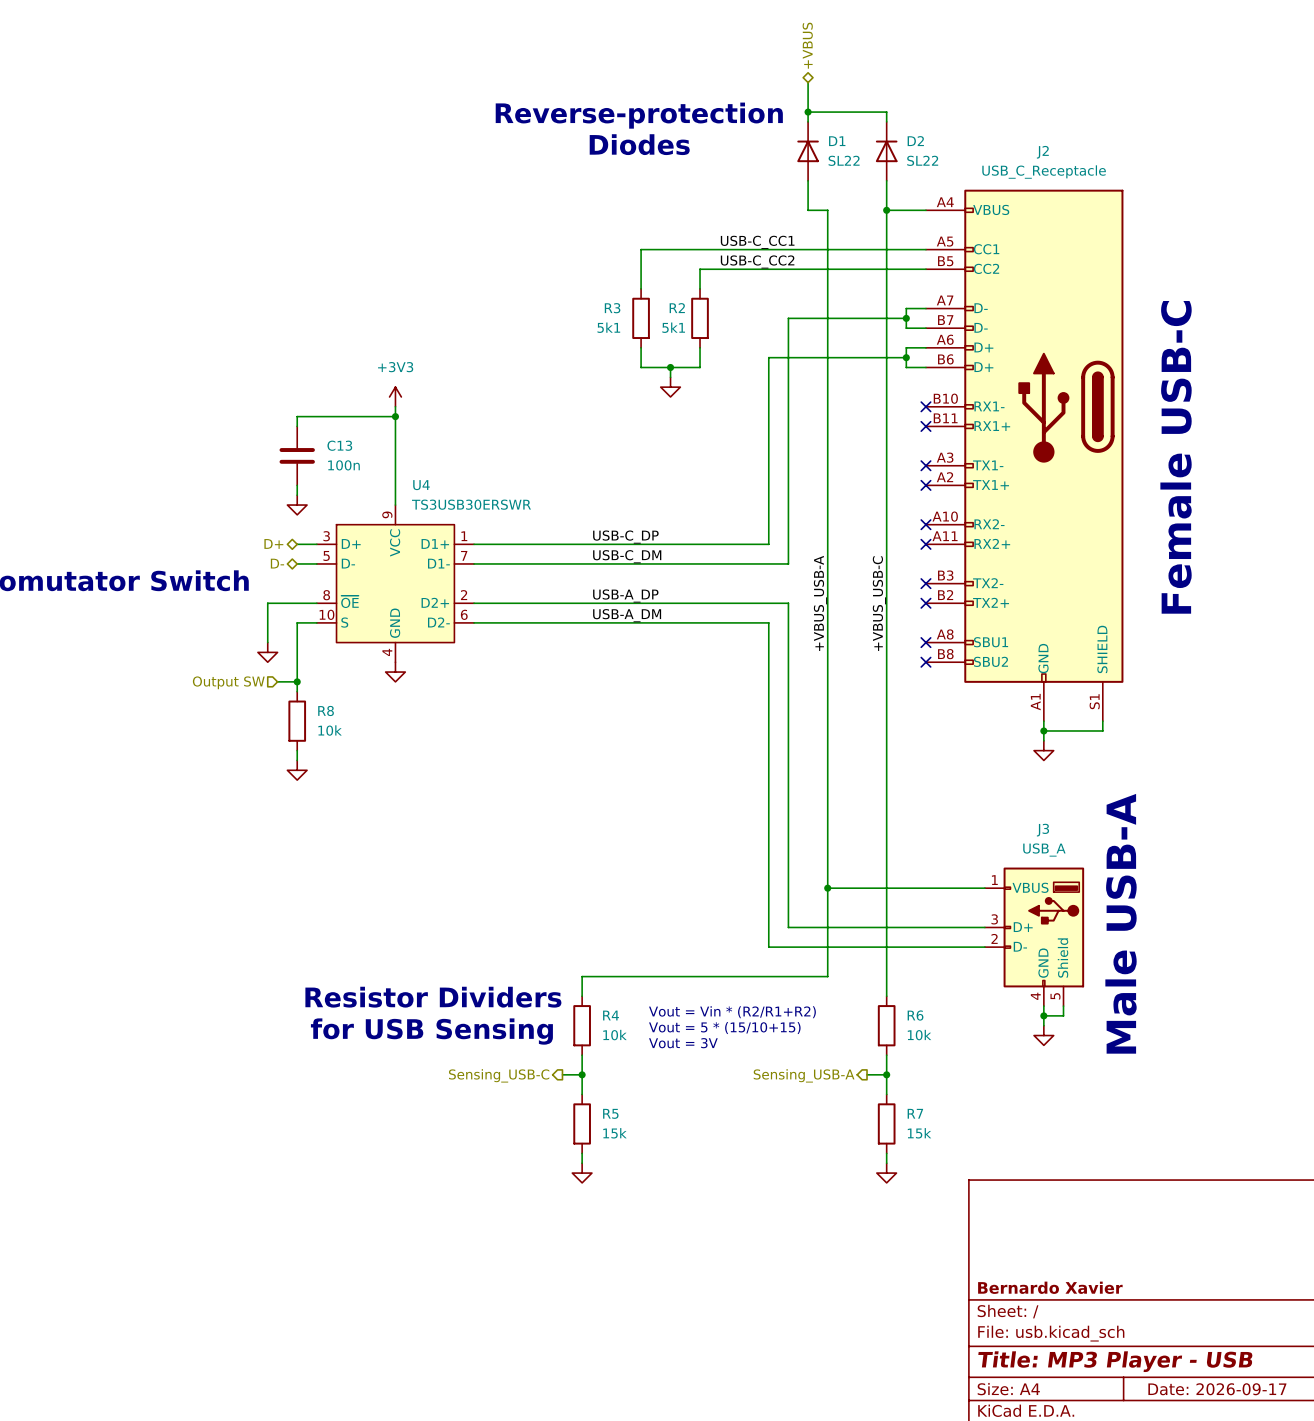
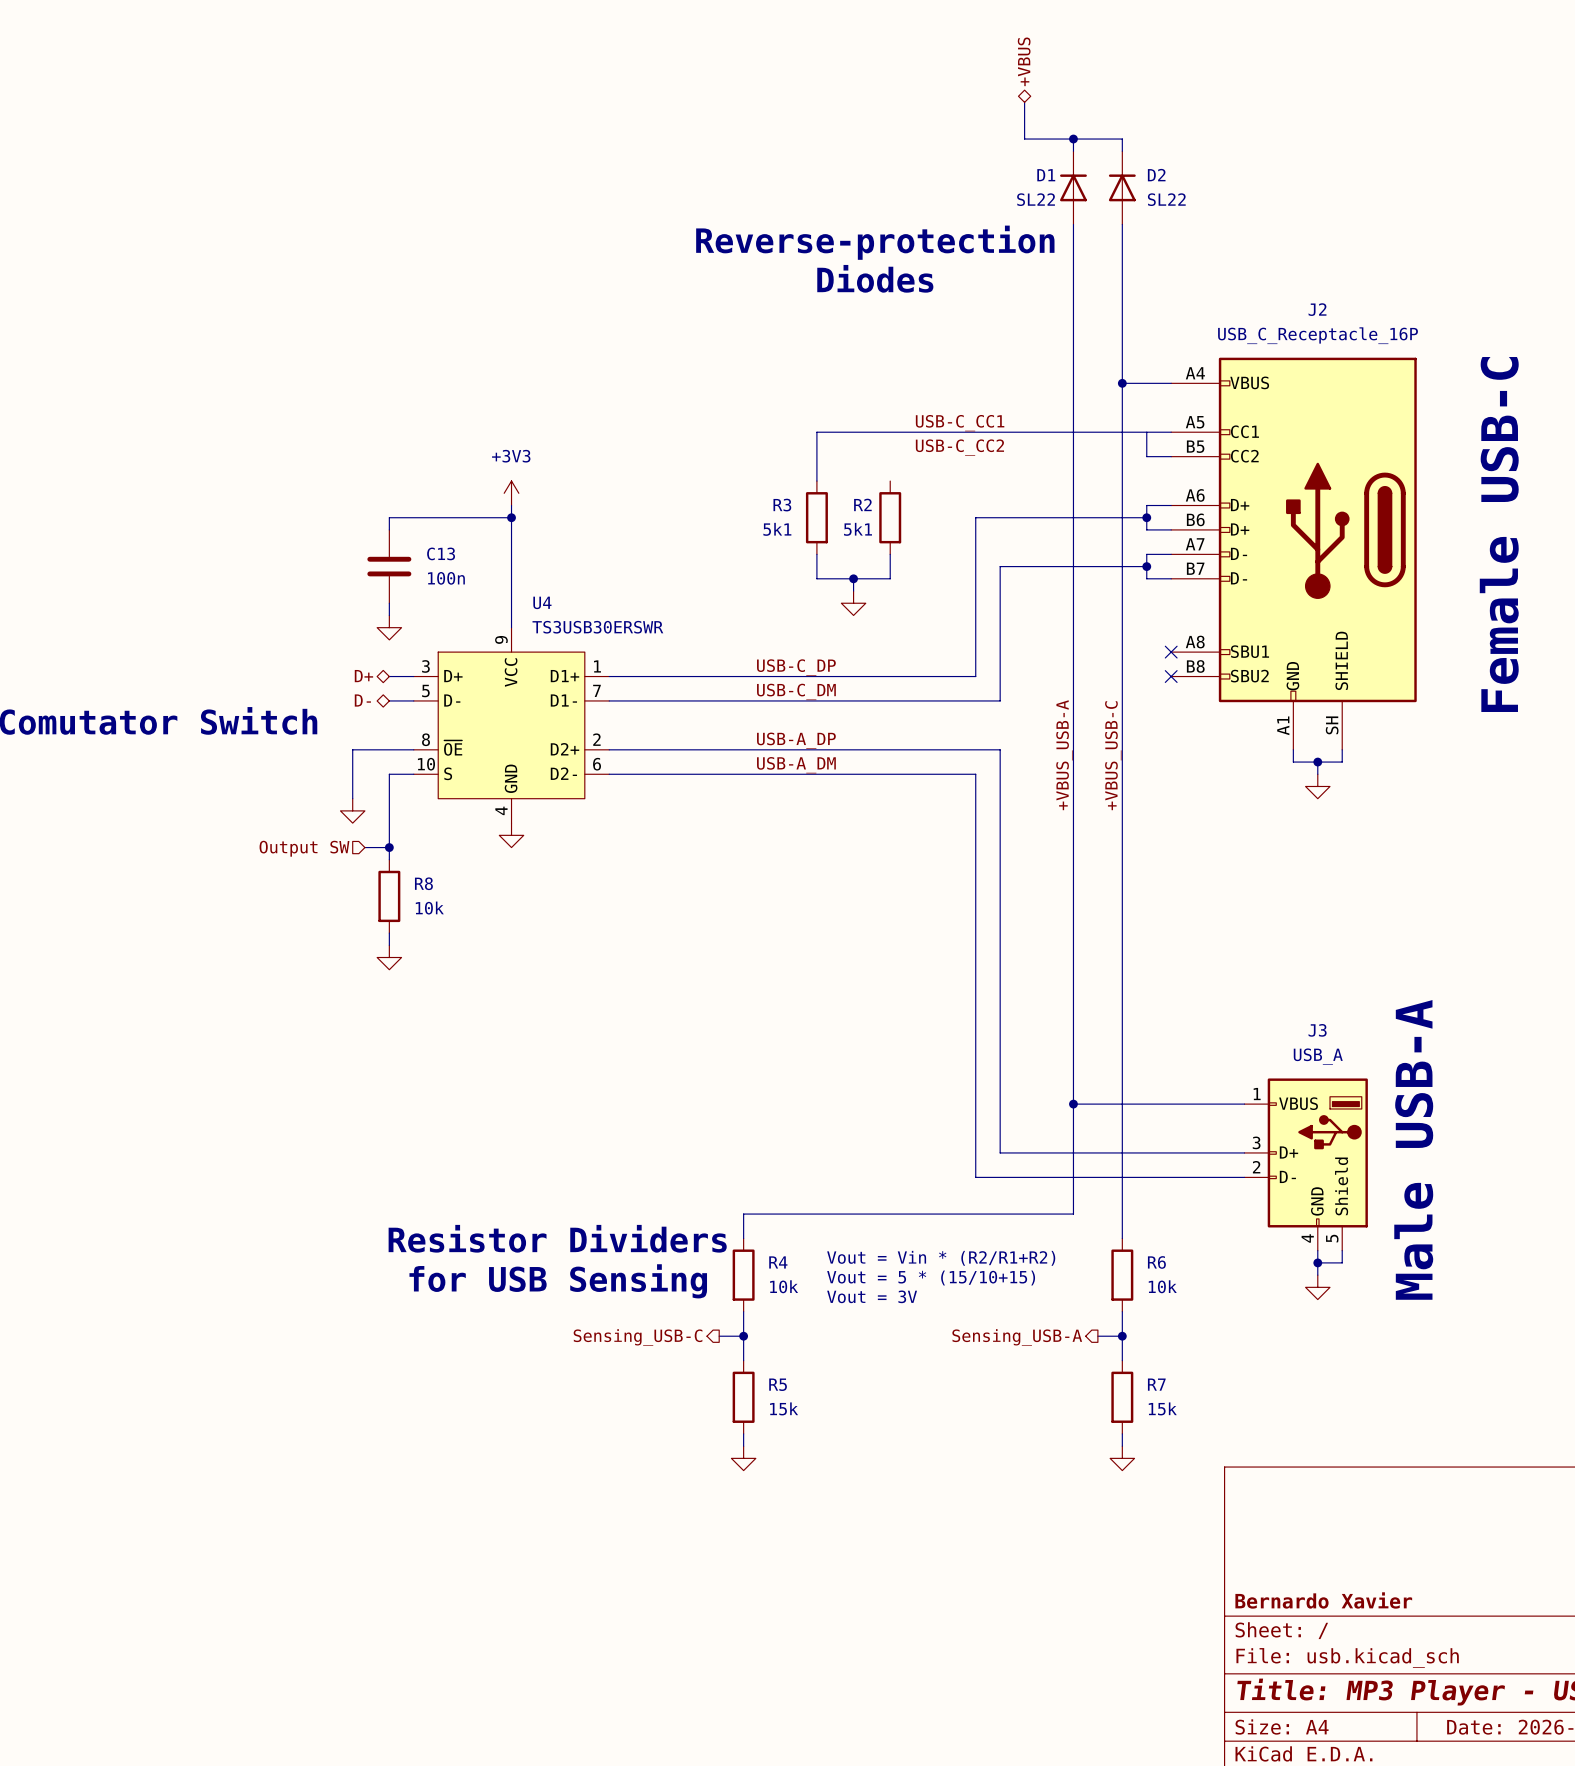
wire: (808, 112) (808, 121) -> (1073, 139) (1073, 151)
junction position: (808, 112) -> (1073, 139)
text position: Reverse-protection (639, 115) -> Reverse-protection (875, 242)
D1 name position: D1 (837, 141) -> D1 (1046, 175)
text position: Diodes (639, 144) -> Diodes (875, 278)
D1 position: (808, 151) -> (1073, 187)
J2 name position: J2 (1042, 152) -> J2 (1317, 309)
D1 value position: SL22 (844, 160) -> SL22 (1036, 199)
J2 value: USB_C_Receptacle (1044, 172) -> USB_C_Receptacle_16P (1318, 335)
wire: (808, 180) (808, 210) (827, 210) (827, 976) -> (1073, 224) (1073, 1214) (1049, 1214)
J2 symbol: [925, 189, 1124, 722] -> [1171, 357, 1417, 750]
wire: (886, 210) (925, 210) -> none
junction: (886, 210) -> none
label position: USB-C_CC1 (757, 242) -> USB-C_CC1 (960, 423)
wire: (925, 249) (641, 249) (641, 288) -> none
label position: USB-C_CC2 (757, 261) -> USB-C_CC2 (959, 447)
wire: (925, 269) (700, 269) (700, 288) -> none
wire: (906, 308) (906, 328) (925, 328) -> (1146, 383) (1122, 383)
R3 position: (641, 318) -> (816, 517)
R2 position: (700, 318) -> (890, 517)
wire: (906, 318) (788, 318) (788, 455) -> (1146, 566) (1000, 566)
junction position: (906, 318) -> (1122, 383)
wire: none -> (816, 432) (1146, 432)
wire: (700, 347) (700, 367) (641, 367) -> (816, 481) (816, 456)
wire: (906, 357) (768, 357) (768, 416) -> (1146, 517) (975, 517)
junction: (906, 357) -> none
wire: (670, 367) (670, 377) -> (853, 578) (853, 591)
junction: (670, 367) -> none
power symbol position: (670, 387) -> (853, 603)
wire: none -> (1171, 505) (1146, 505) (1146, 529) (1171, 529)
no-connect mark: (925, 406) -> none
junction: none -> (1146, 517)
no-connect mark: (925, 426) -> none
wire: none -> (816, 554) (816, 578) (890, 578) (890, 554)
wire: none -> (1171, 554) (1146, 554) (1146, 578) (1171, 578)
junction: none -> (1146, 566)
text position: Female USB-C (1176, 457) -> Female USB-C (1499, 534)
junction: none -> (853, 578)
no-connect mark: (925, 465) -> none
no-connect mark: (925, 485) -> none
no-connect mark: (925, 583) -> none
label position: +VBUS_USB-A (820, 603) -> +VBUS_USB-A (1064, 755)
no-connect mark: (925, 603) -> none
junction: none -> (1317, 762)
no-connect mark: (925, 642) -> none
no-connect mark: (925, 662) -> none
wire: (1043, 721) (1043, 740) -> none
wire: (1102, 721) (1102, 730) (1043, 730) -> none
junction: (1043, 730) -> none
power symbol position: (1043, 750) -> (1317, 786)
wire: (827, 888) (847, 888) -> none
junction position: (827, 888) -> (1073, 1104)

